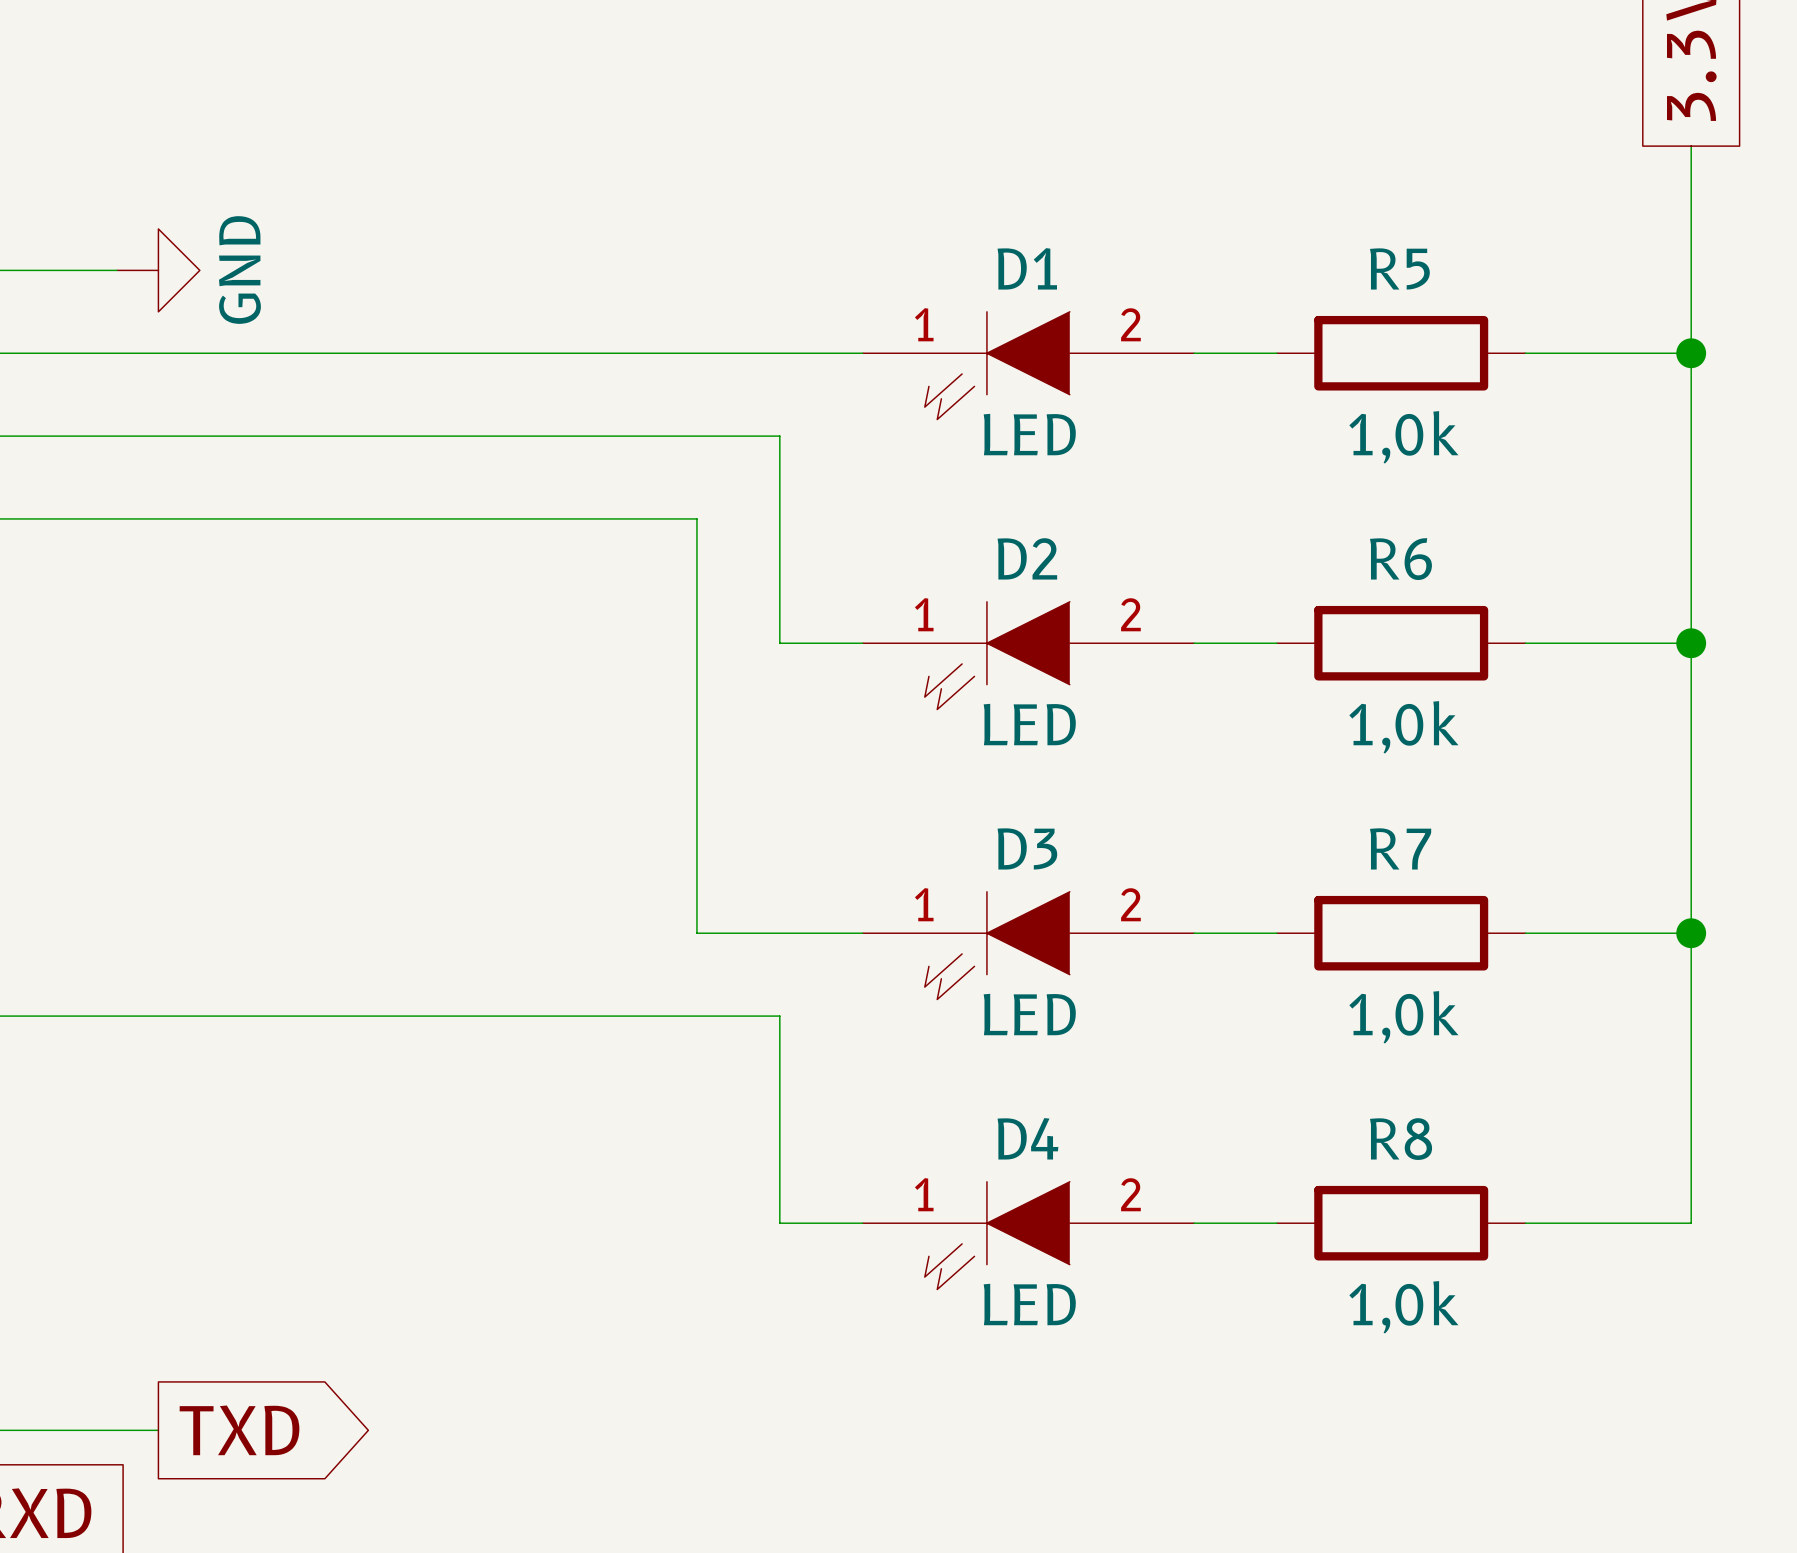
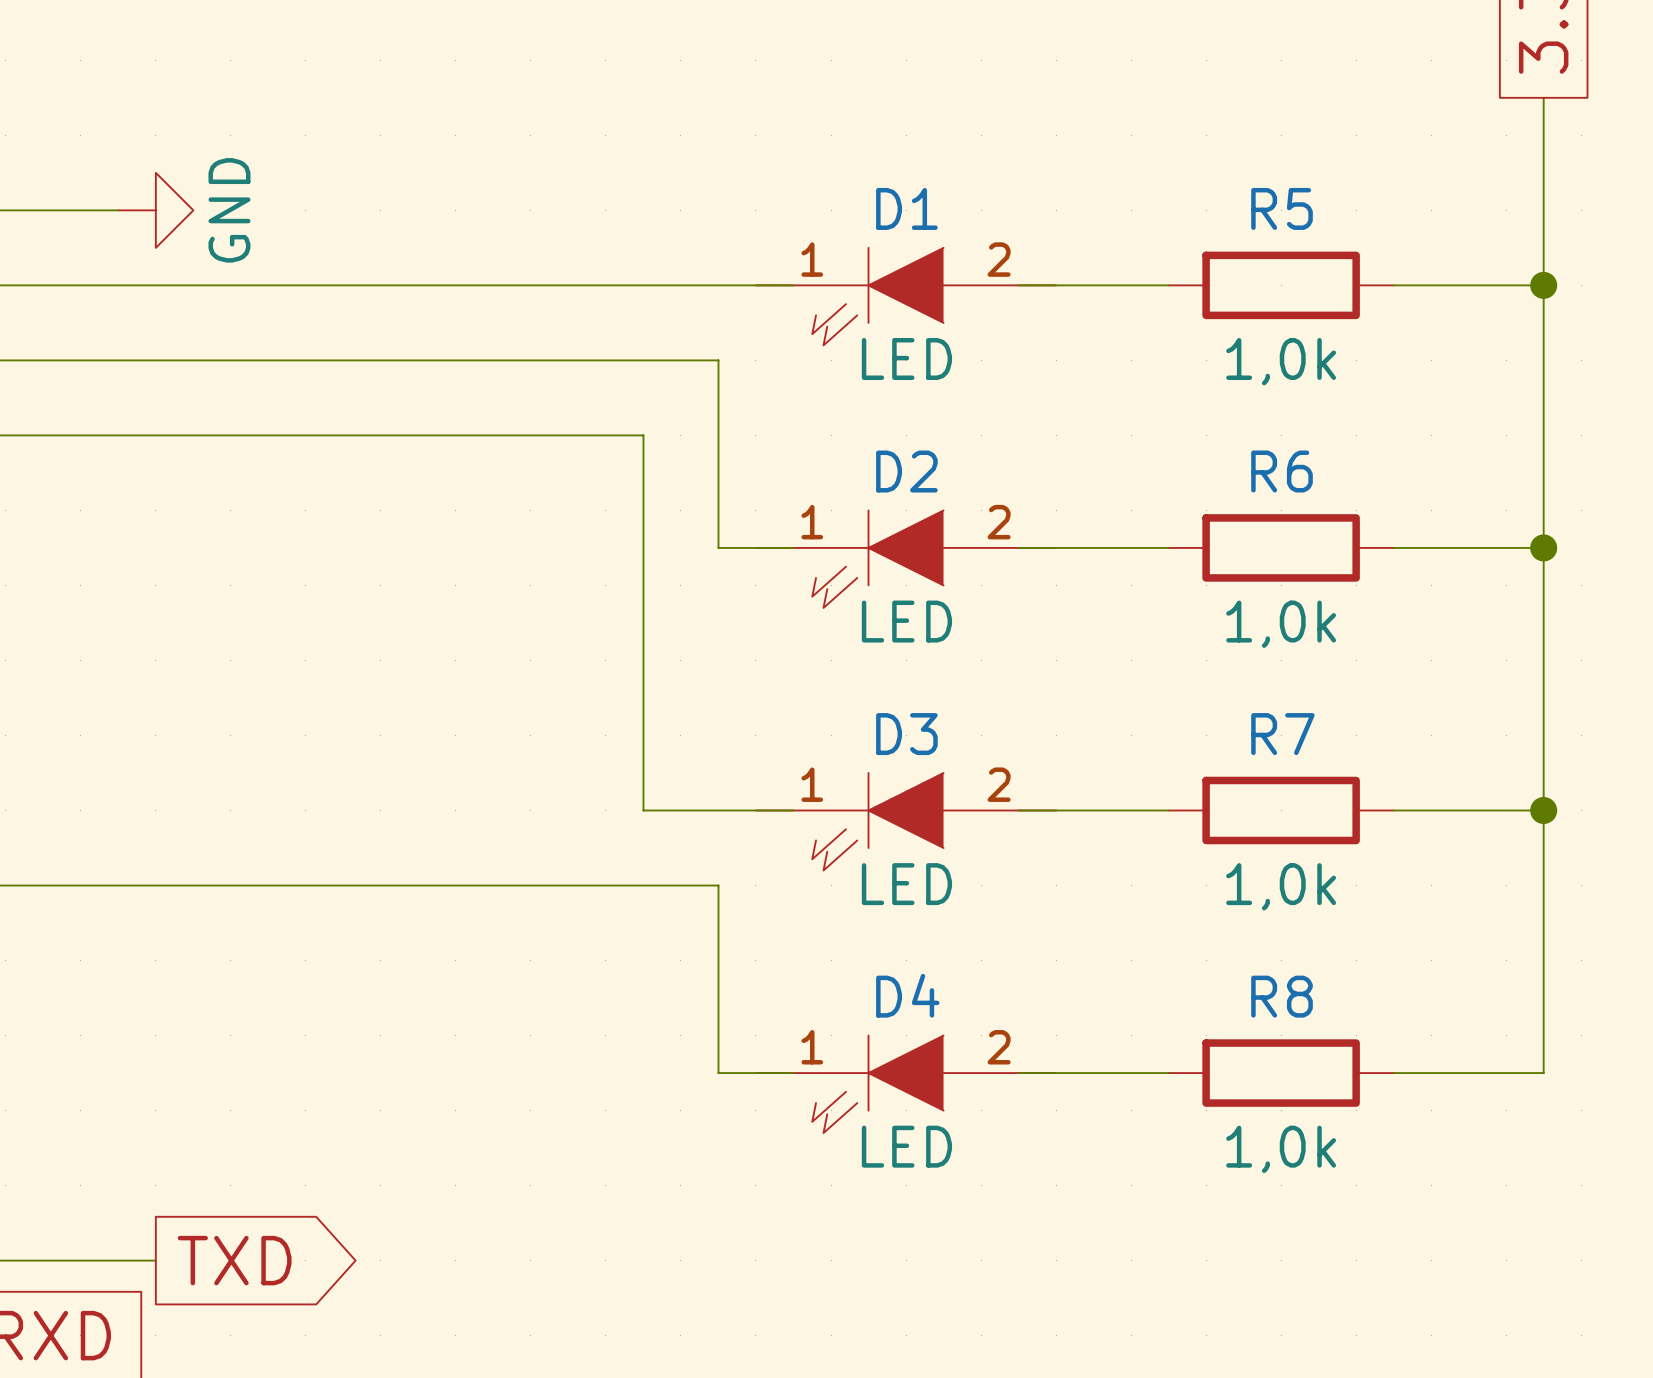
D1 position: (1028, 365) -> (906, 296)
D2 position: (1028, 655) -> (906, 559)
D3 position: (1028, 945) -> (906, 821)
D4 position: (1028, 1235) -> (906, 1084)

